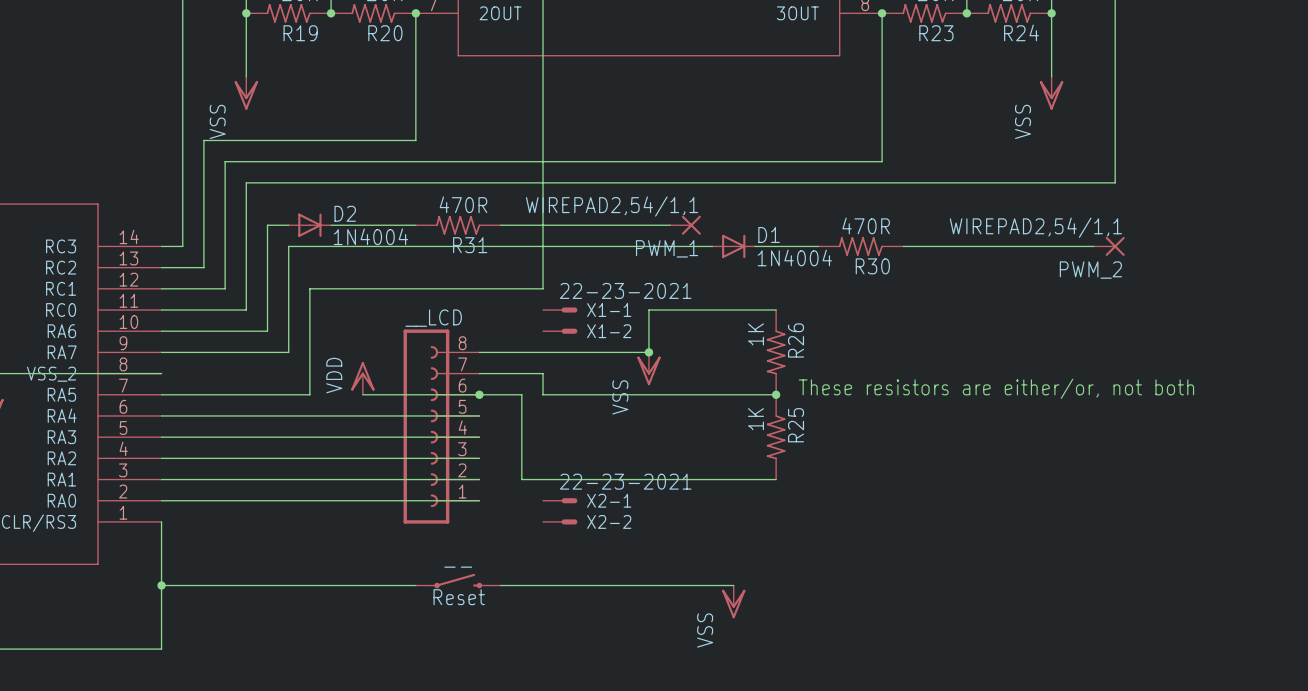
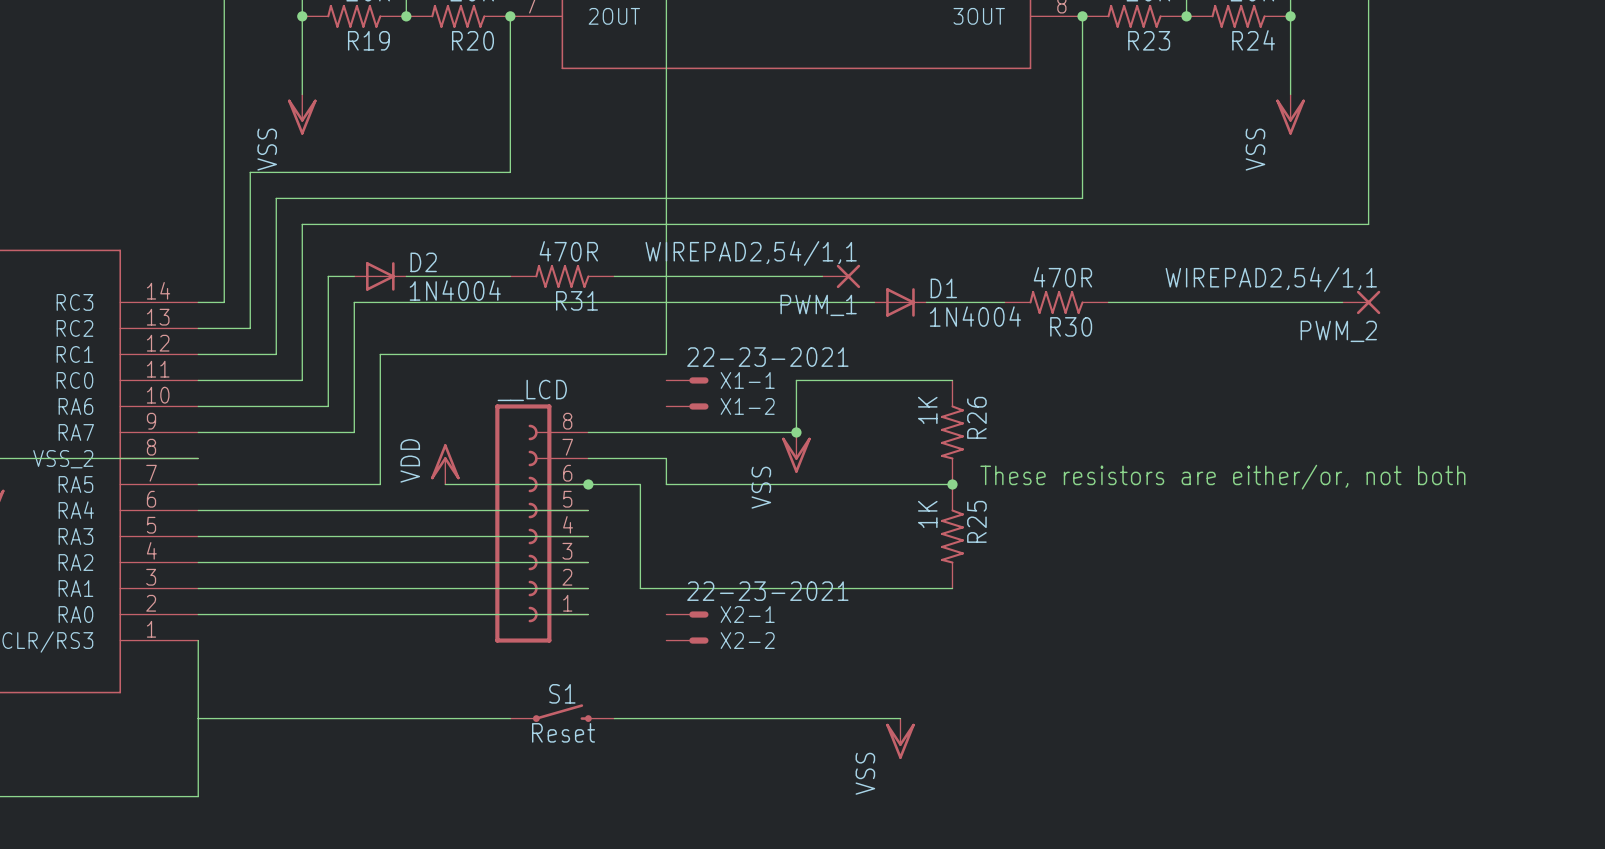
S1 name: -- (458, 567) -> S1 (562, 693)
junction: (161, 585) -> none

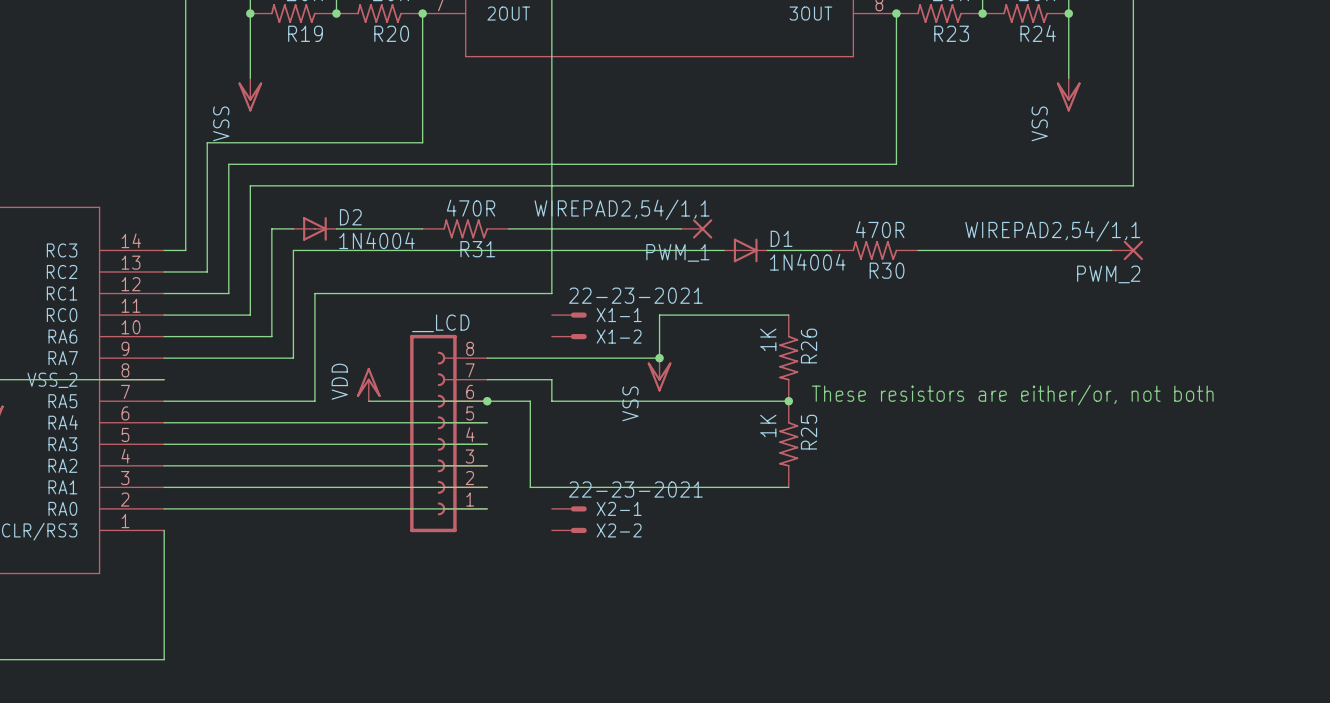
S1: Reset (562, 713) -> none
wire: (198, 718) (510, 718) -> none
wire: (614, 718) (900, 718) -> none
power symbol: VSS (900, 738) -> none

